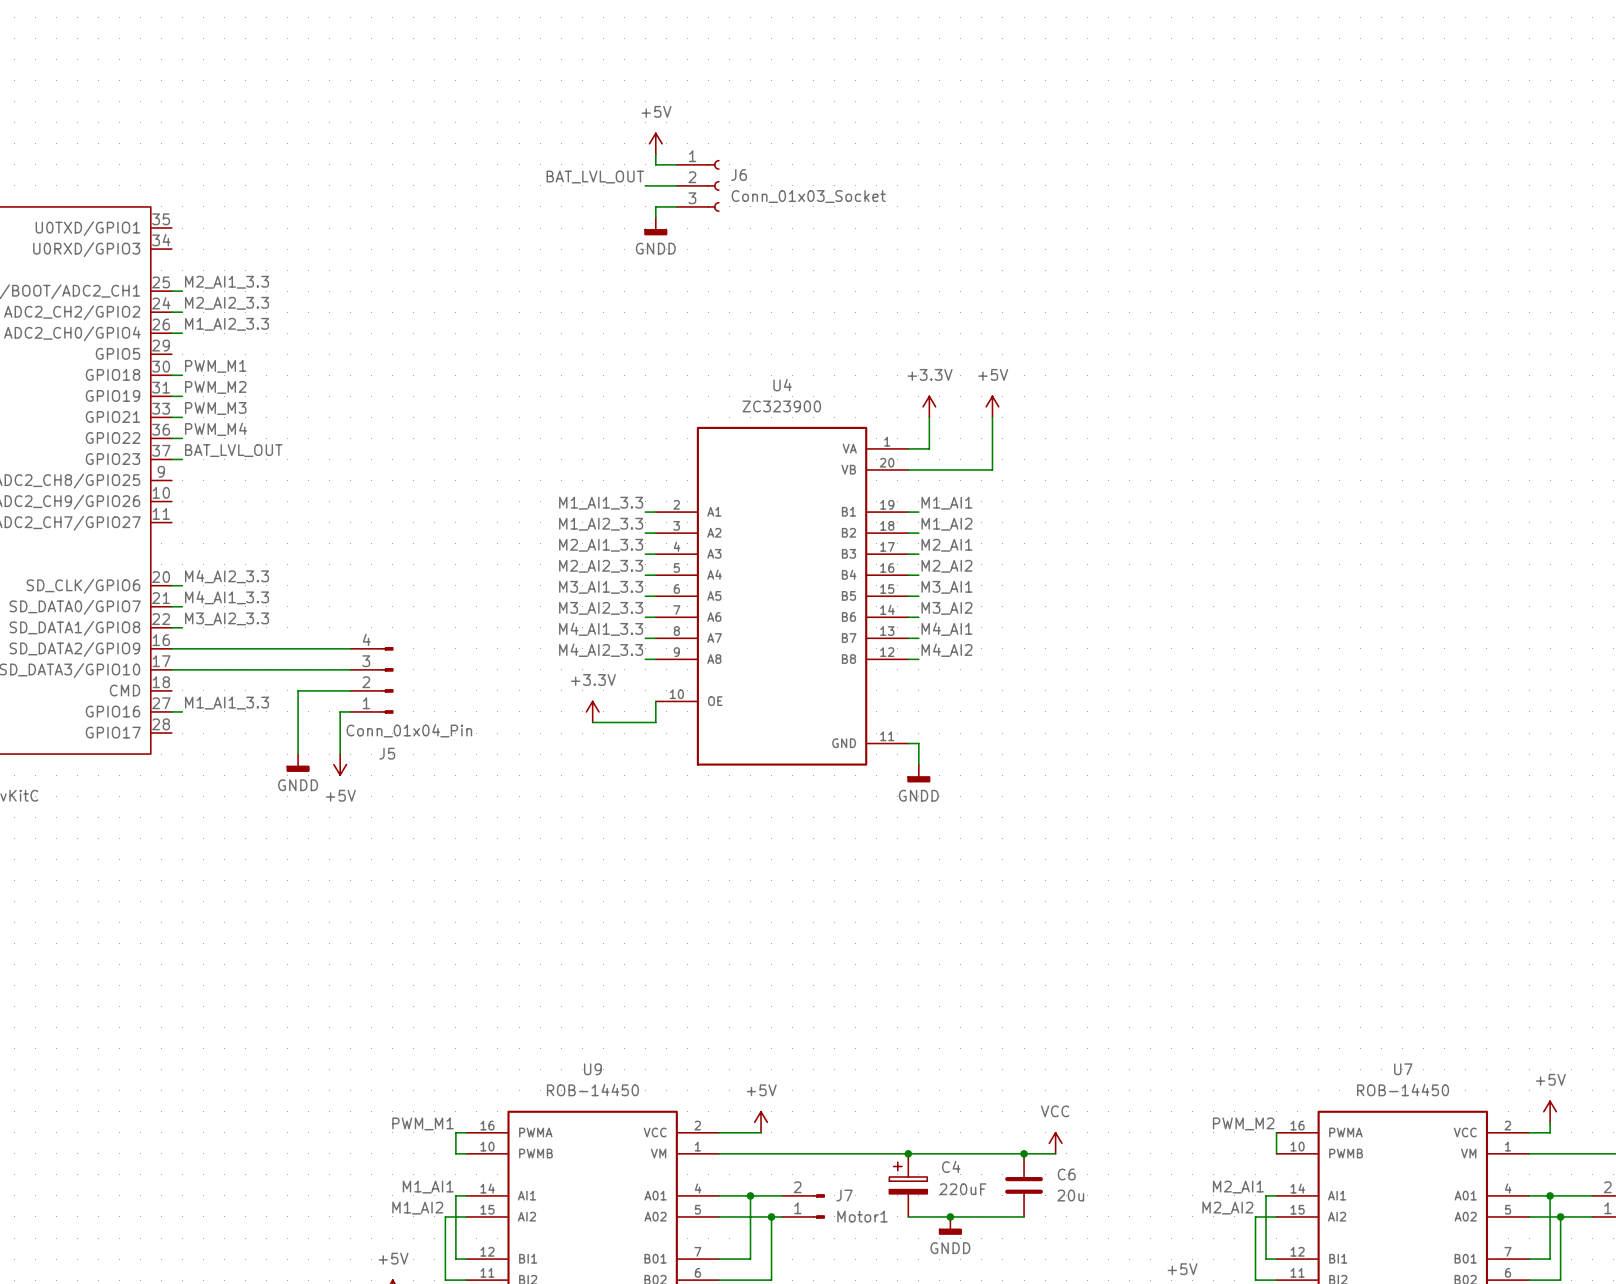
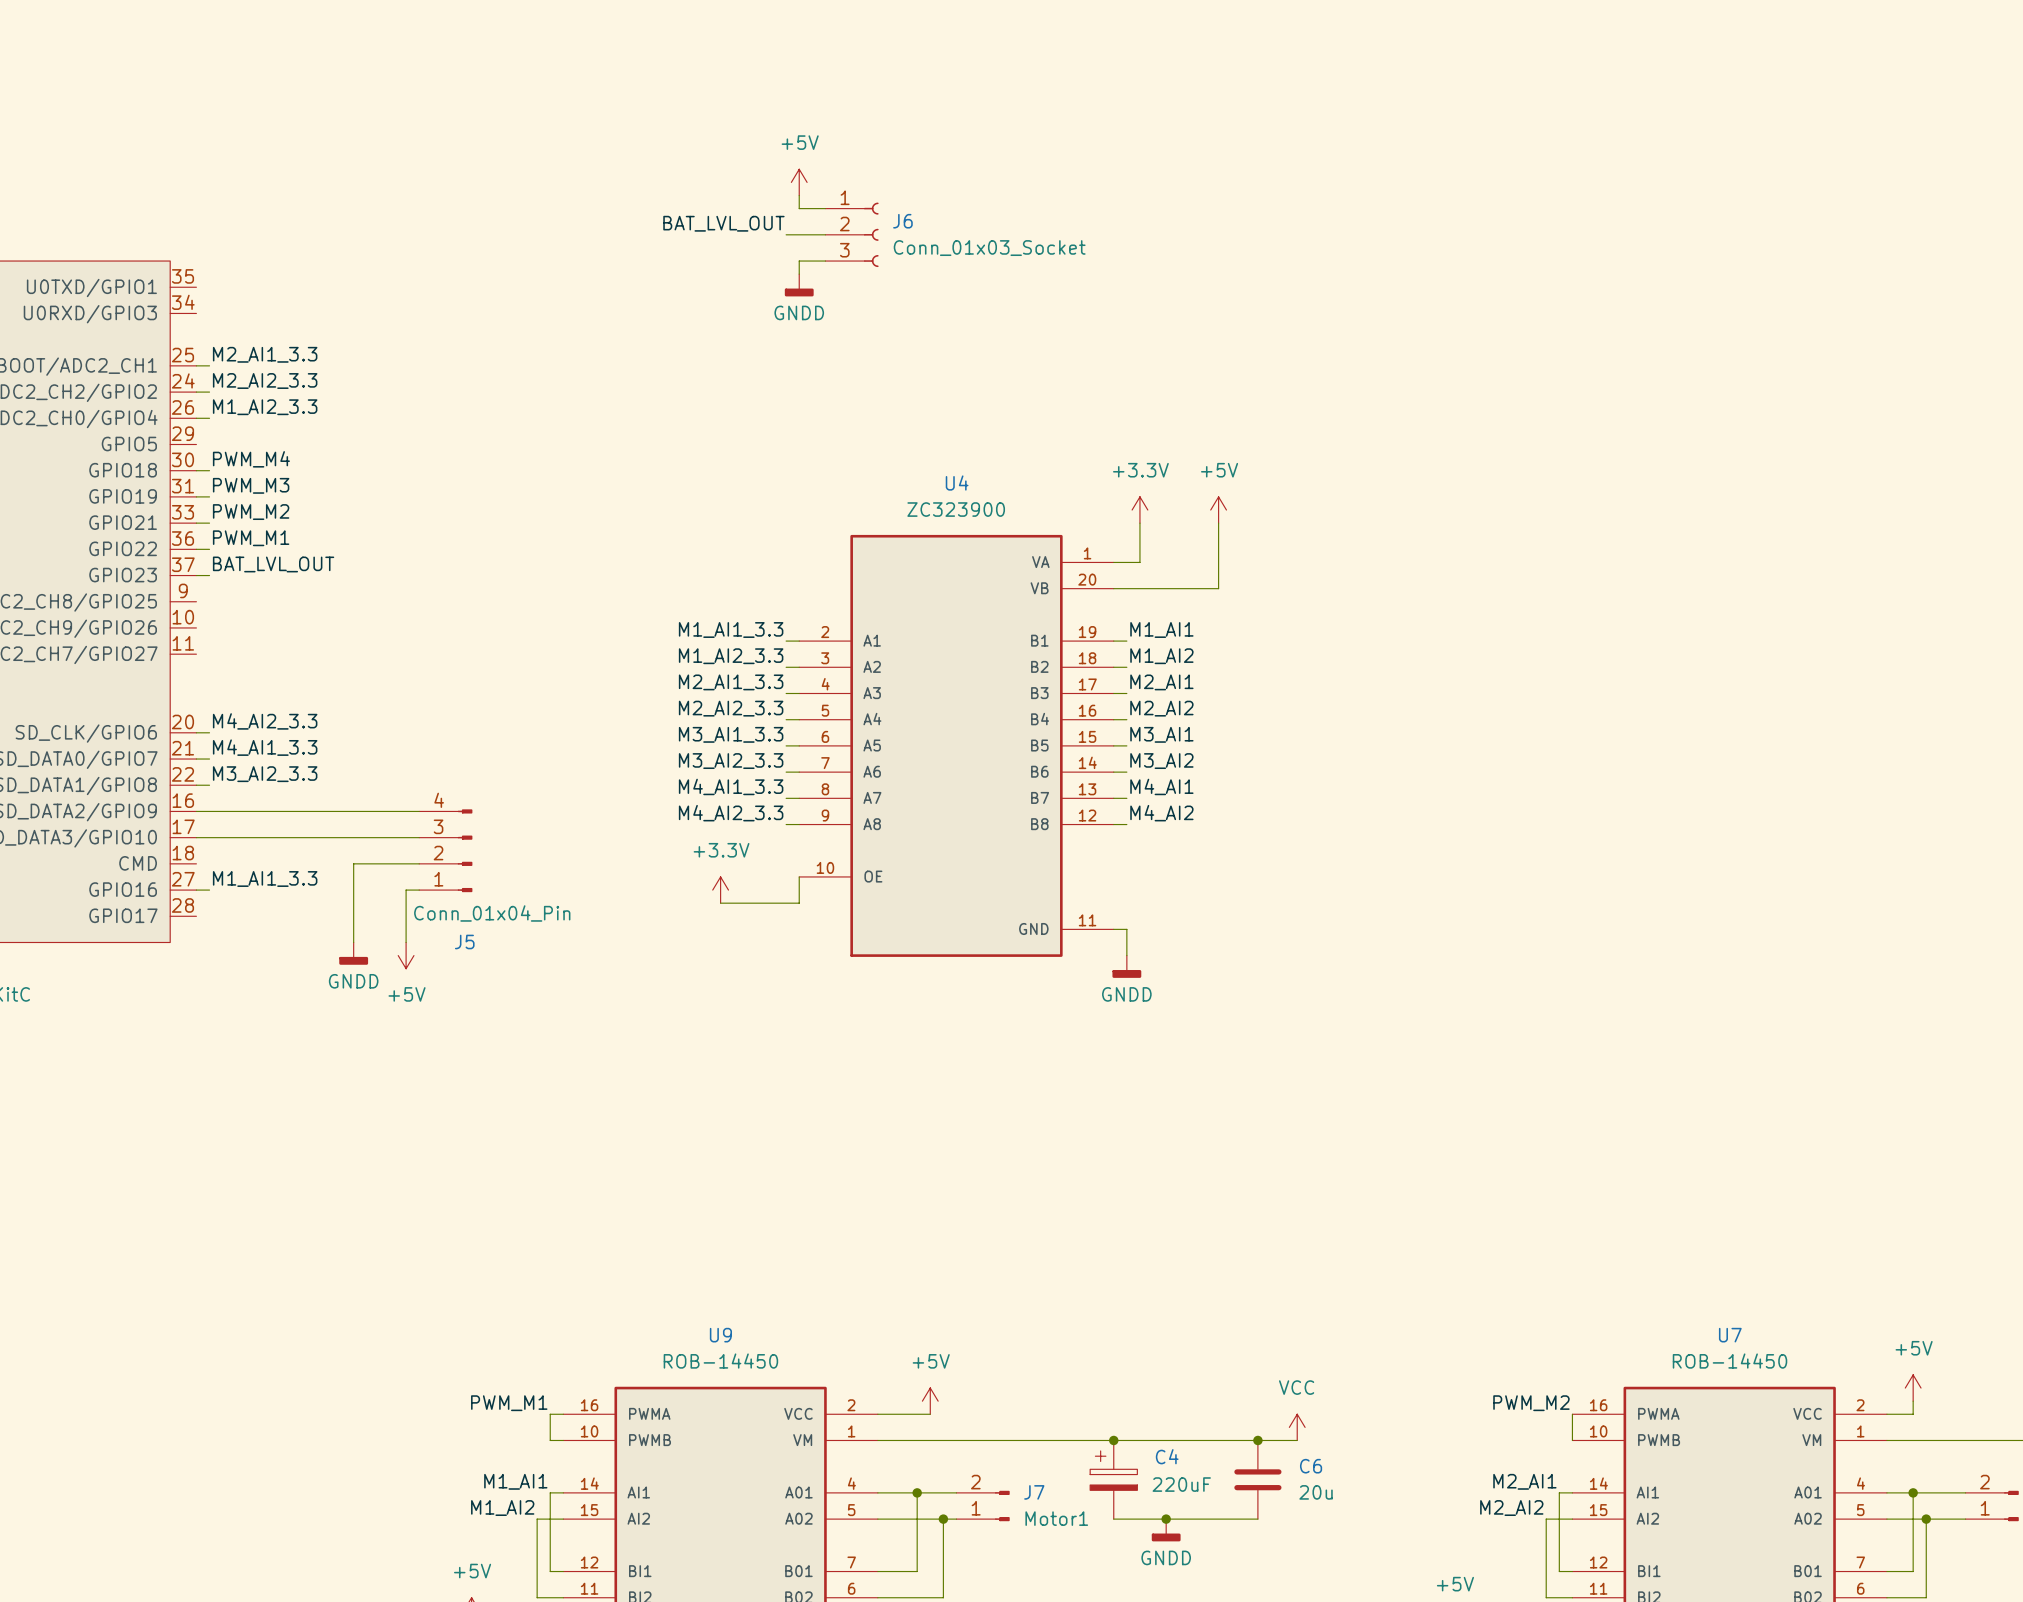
label: PWM_M1 (215, 366) -> PWM_M4 (251, 459)
label: PWM_M2 (215, 387) -> PWM_M3 (251, 485)
label: PWM_M3 (215, 408) -> PWM_M2 (251, 512)
label: PWM_M4 (216, 429) -> PWM_M1 (251, 538)

